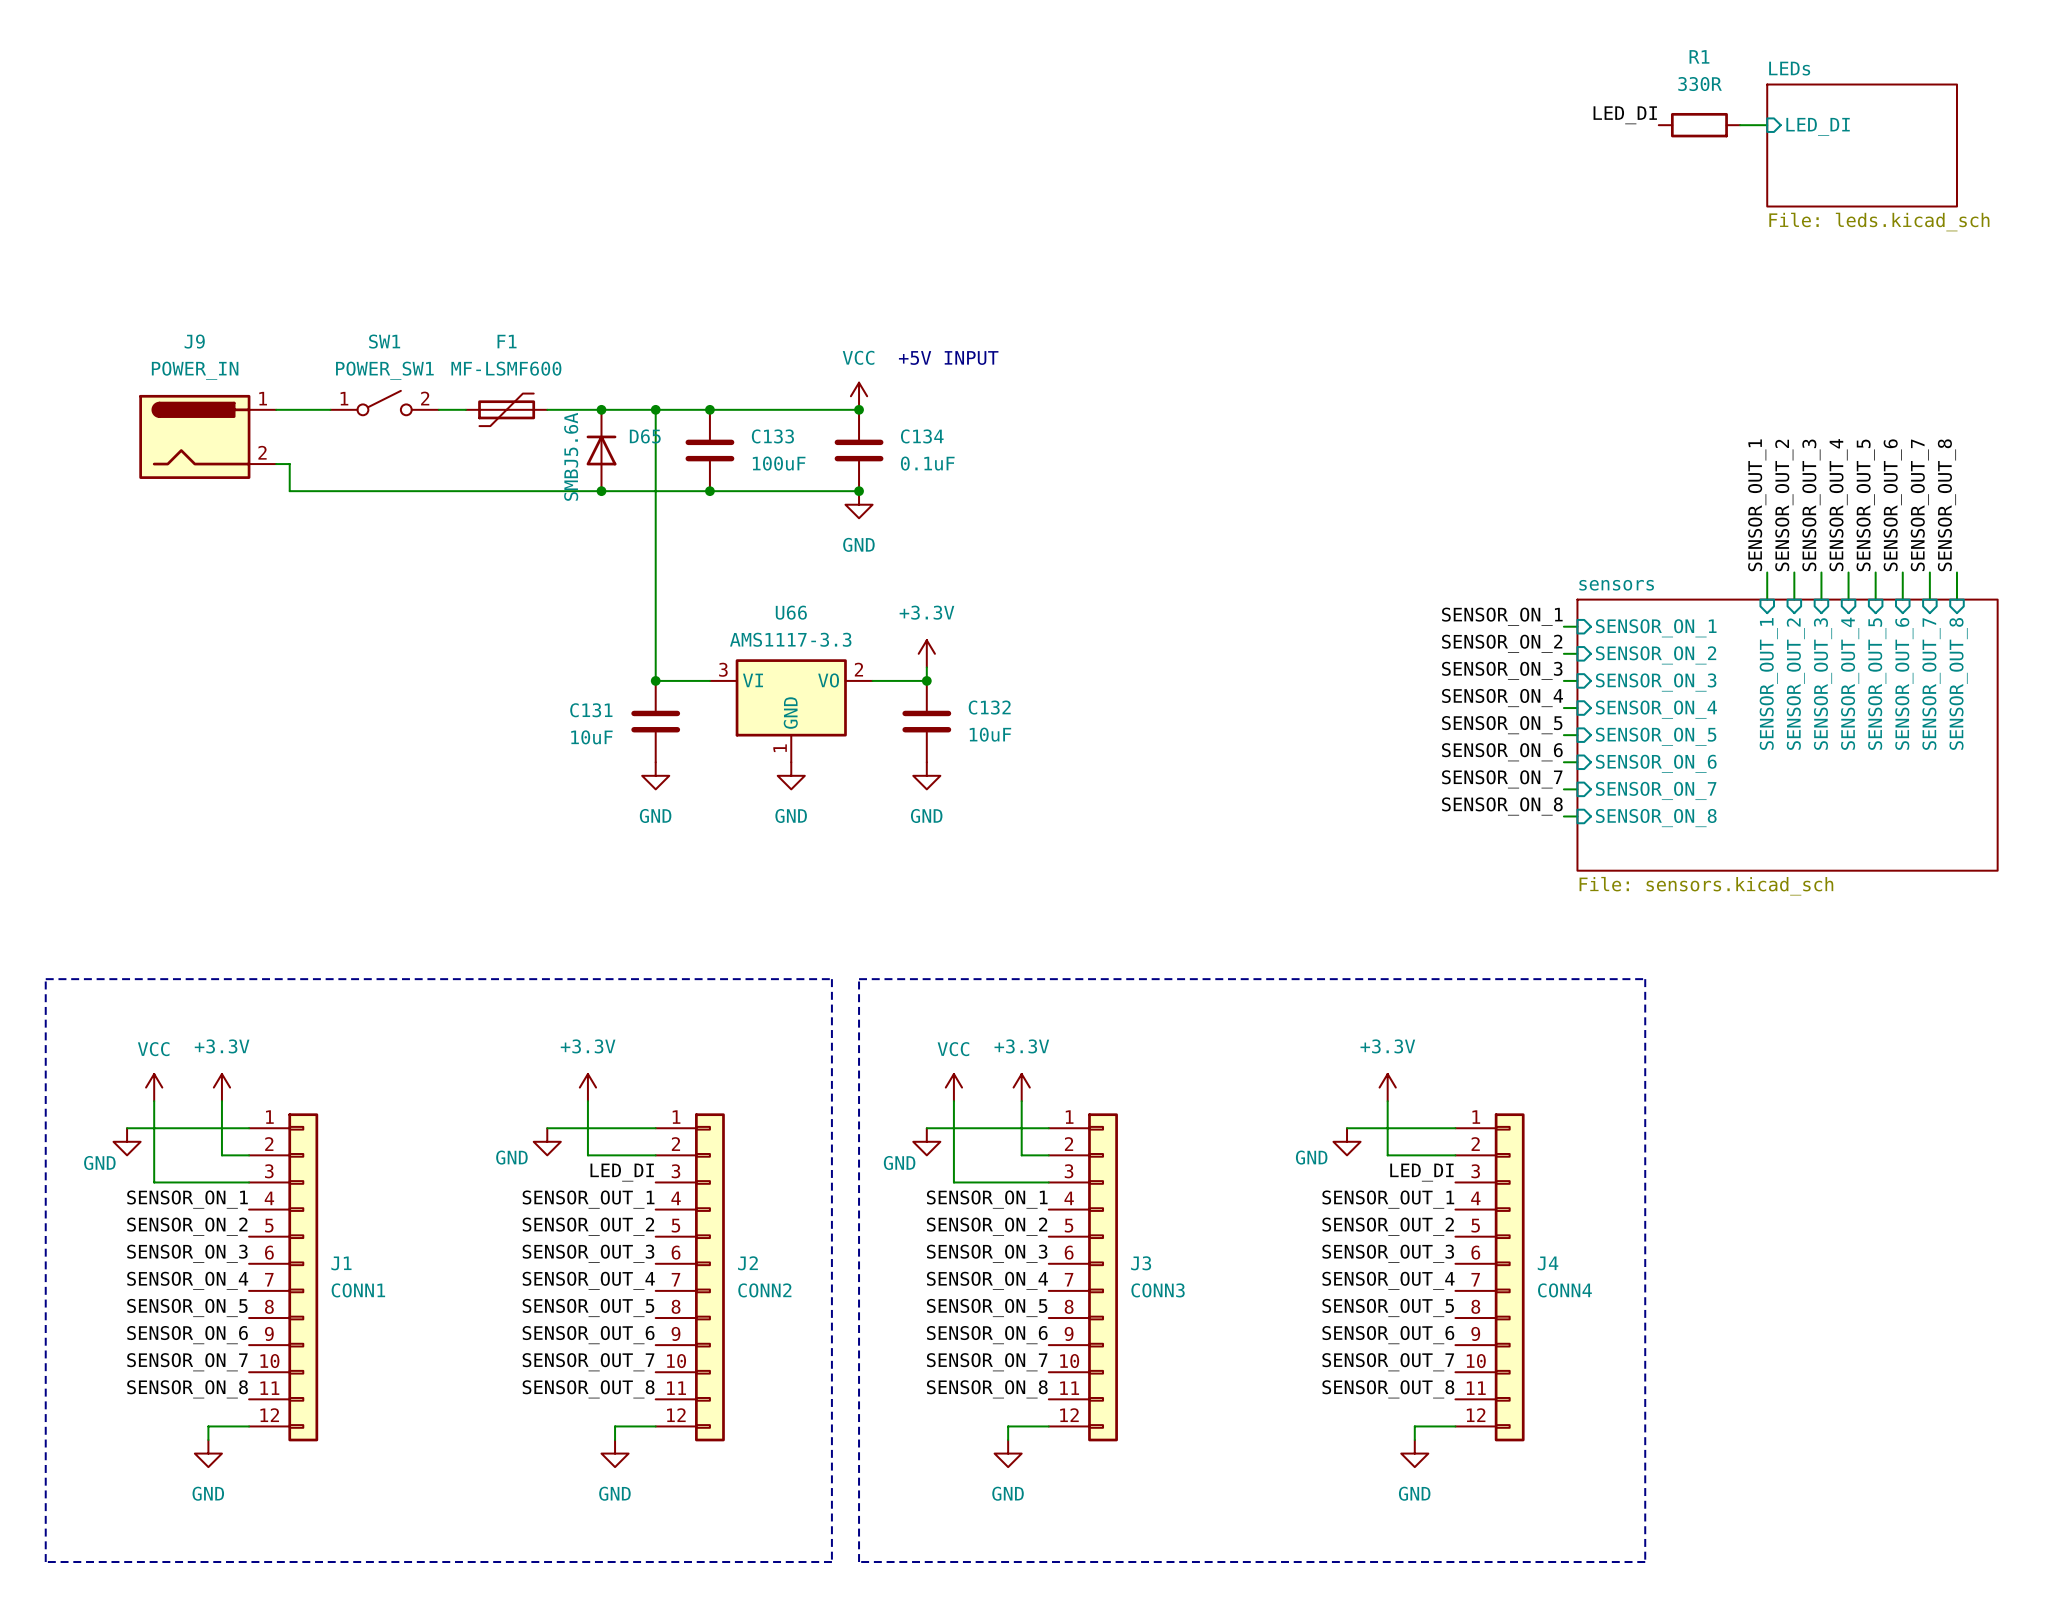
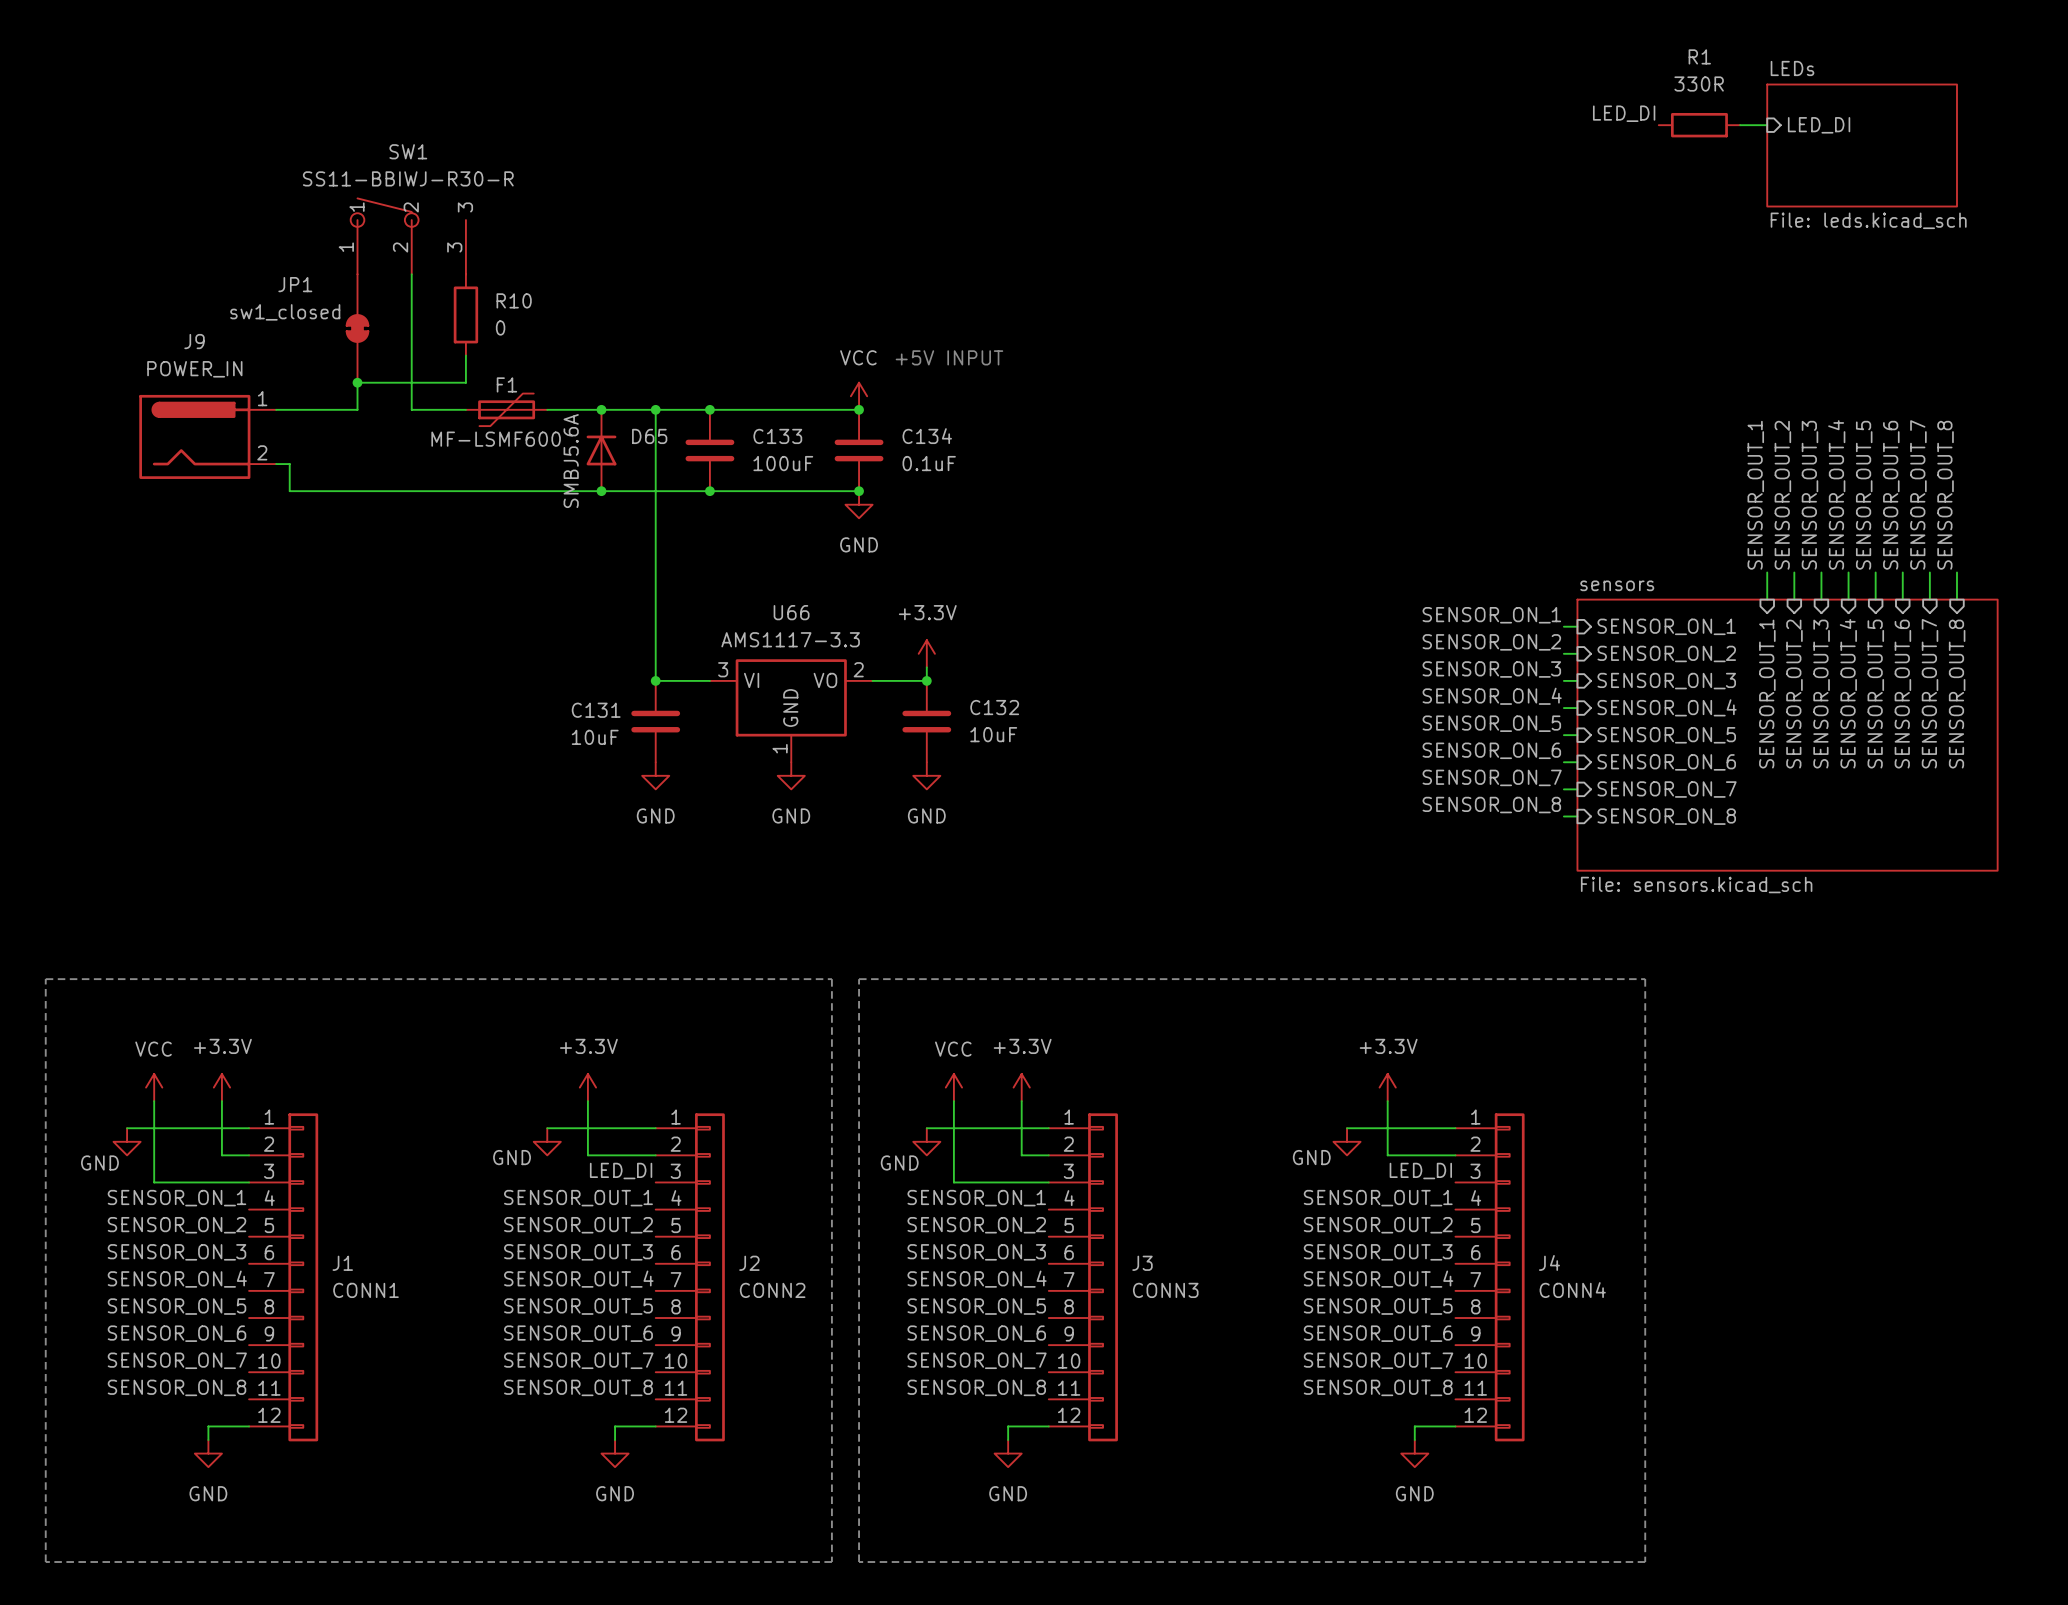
wire: none -> (411, 274) (411, 409) (438, 409)
R10: none -> 0 (465, 314)
JP1: none -> sw1_closed (357, 328)
SW1 name position: SW1 (384, 341) -> SW1 (408, 151)
F1 name position: F1 (507, 341) -> F1 (506, 384)
wire: none -> (465, 355) (465, 382) (357, 382) (357, 409) (330, 409)
F1 value position: MF-LSMF600 (506, 368) -> MF-LSMF600 (496, 439)
SW1 value: POWER_SW1 (384, 370) -> SS11-BBIWJ-R30-R (408, 178)
junction: none -> (357, 382)
SW1 symbol: [330, 390, 439, 416] -> [350, 198, 466, 275]

